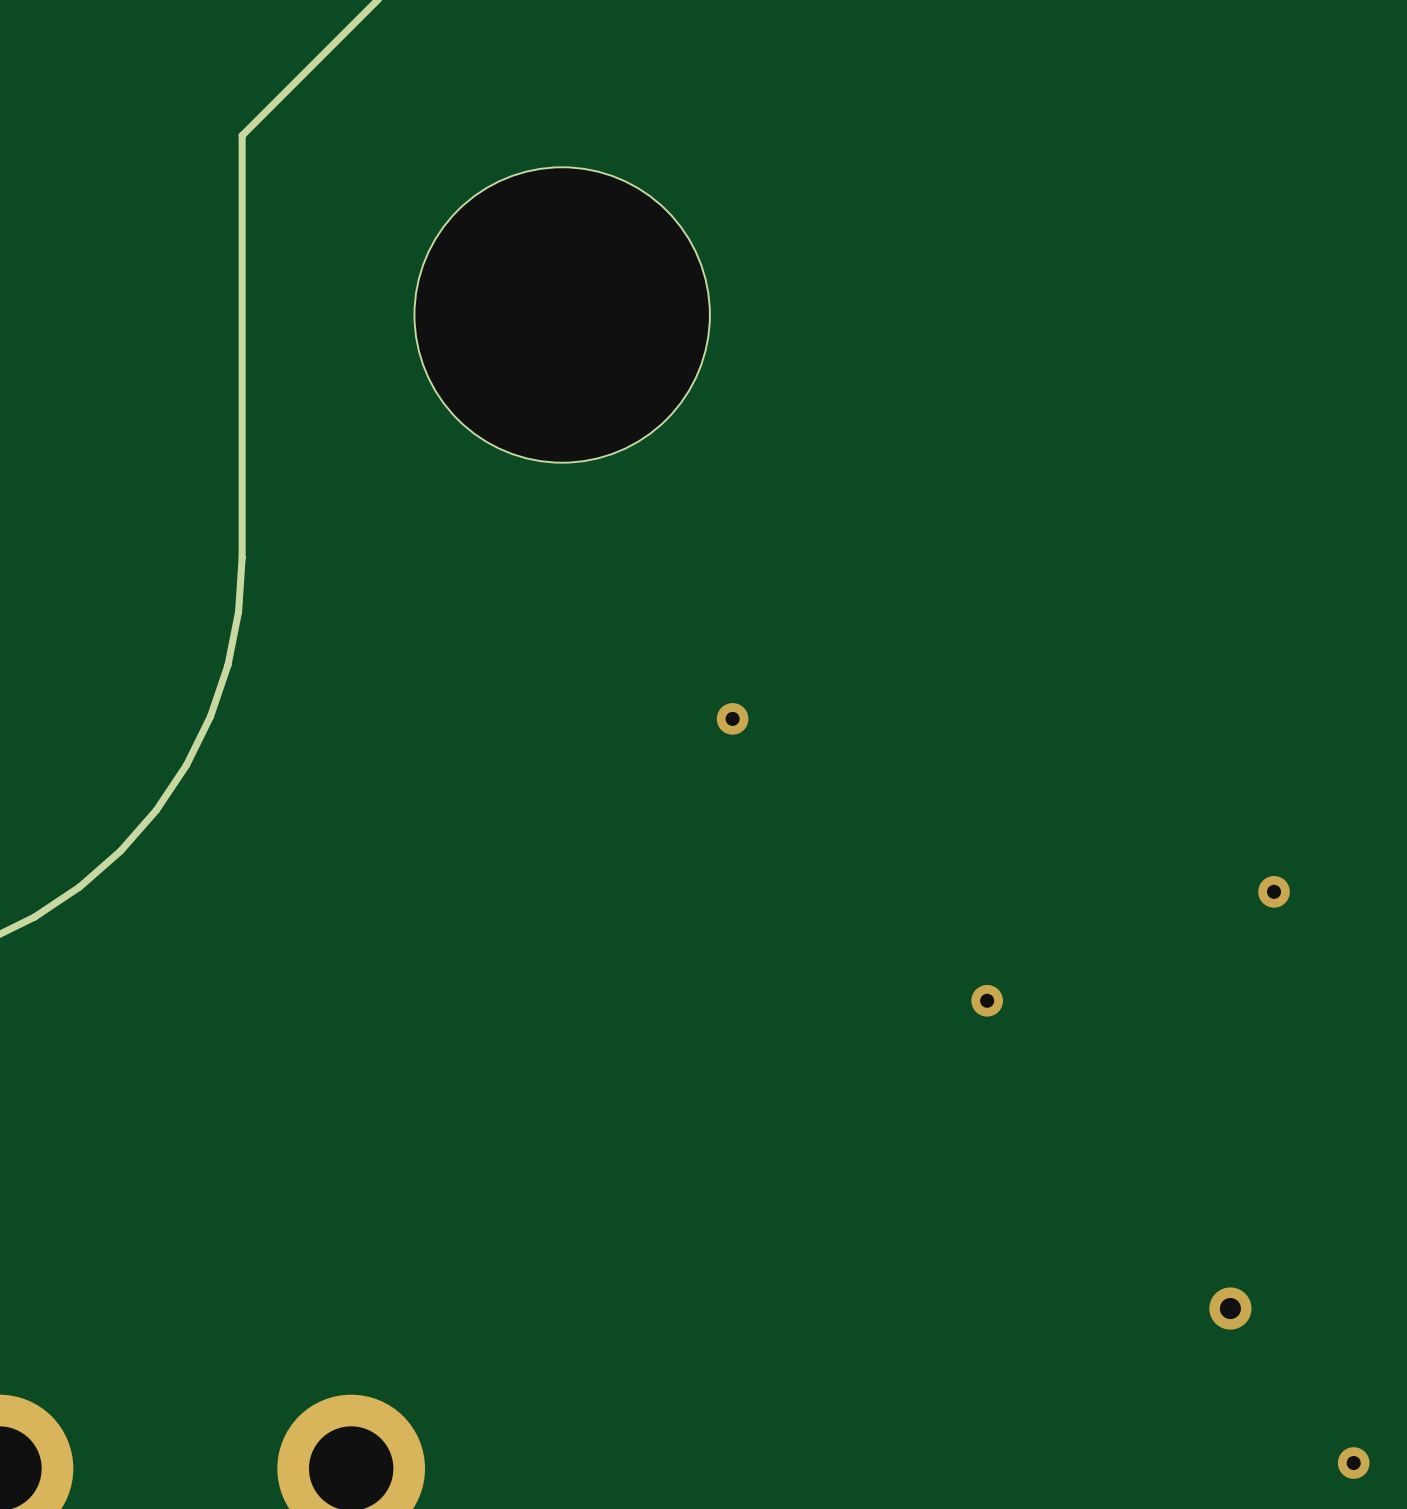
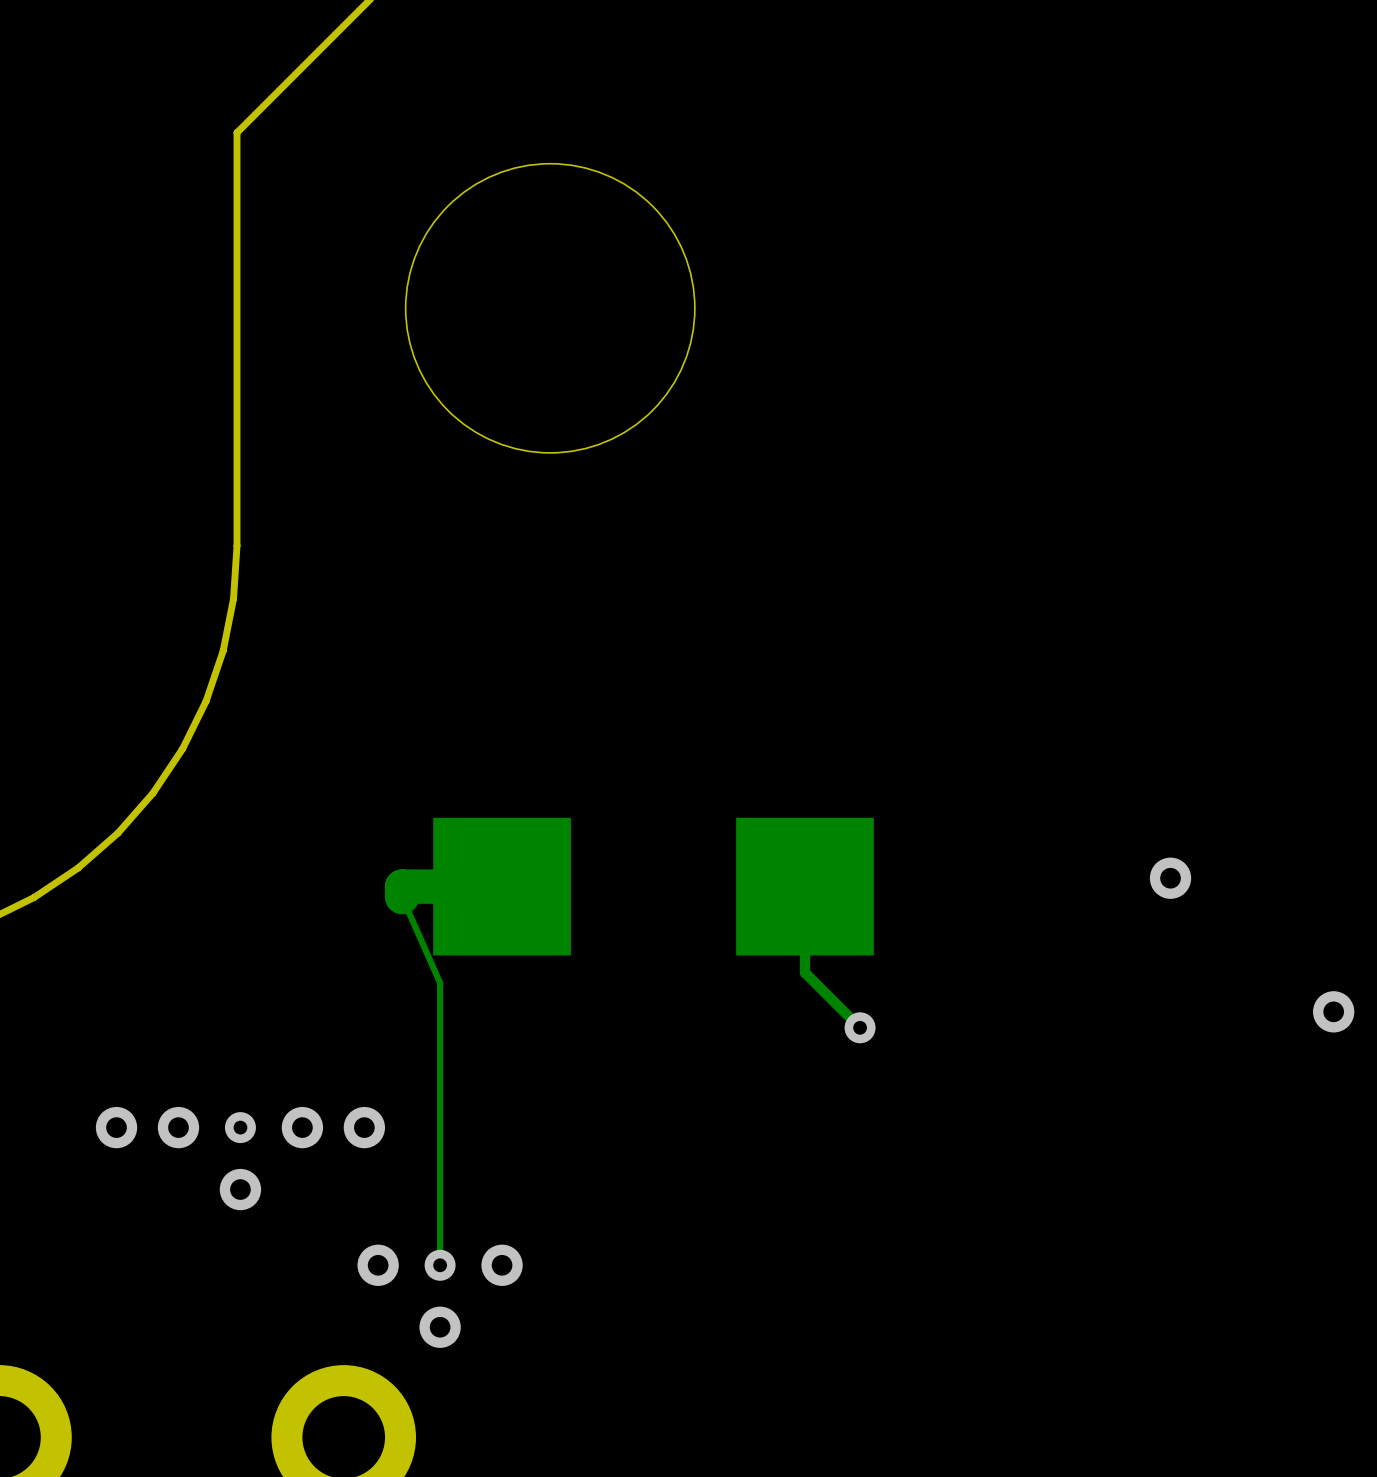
via: (732, 718) -> none
via: (1274, 891) -> none
via: none -> (1170, 878)
track: none -> (502, 886) (402, 886) (402, 897) (440, 983) (440, 1265)
part: none -> (653, 886)
track: none -> (804, 886) (804, 972) (860, 1027)
via position: (987, 1000) -> (860, 1027)
via: none -> (1333, 1011)
via: none -> (116, 1127)
via: none -> (178, 1127)
via: none -> (240, 1127)
via: none -> (302, 1127)
via: none -> (364, 1127)
via: none -> (240, 1189)
via: none -> (378, 1265)
via: none -> (440, 1265)
via: none -> (502, 1265)
via: (1230, 1308) -> none
via: none -> (440, 1327)
via: (1353, 1463) -> none

